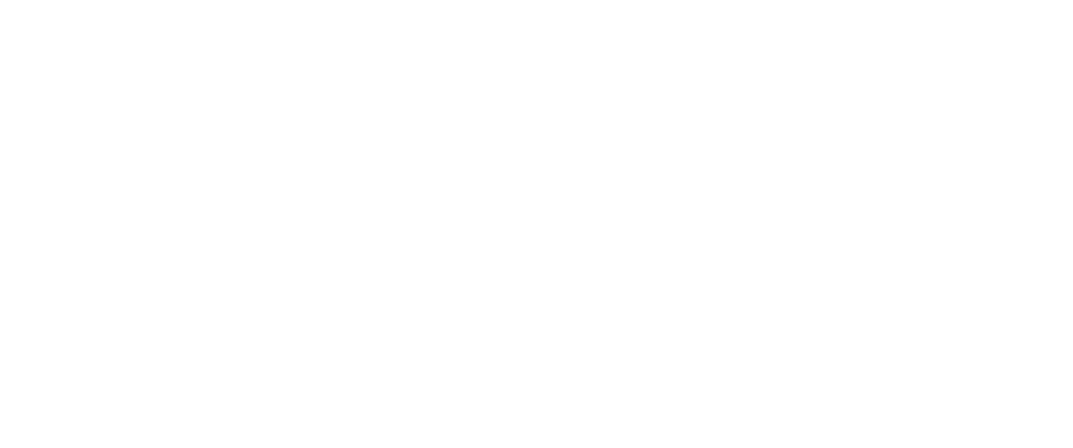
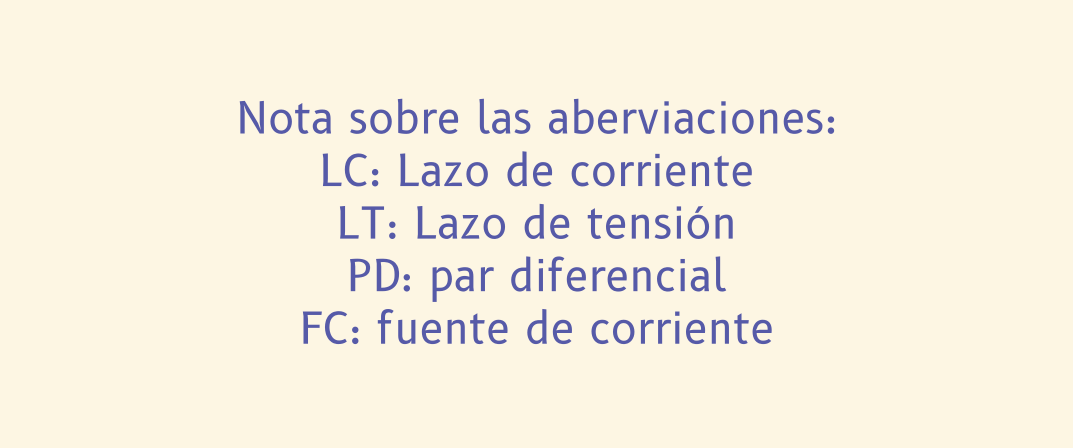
text: none -> Nota sobre las aberviaciones: (536, 116)
text: none -> LC: Lazo de corriente (537, 168)
text: none -> LT: Lazo de tensión (536, 221)
text: none -> PD: par diferencial (538, 279)
text: none -> FC: fuente de corriente (537, 326)

